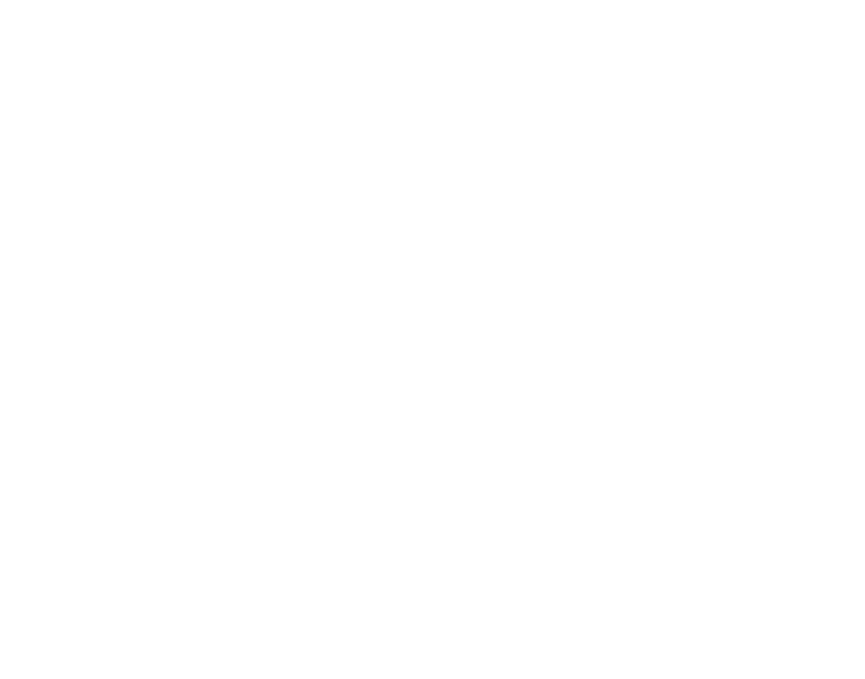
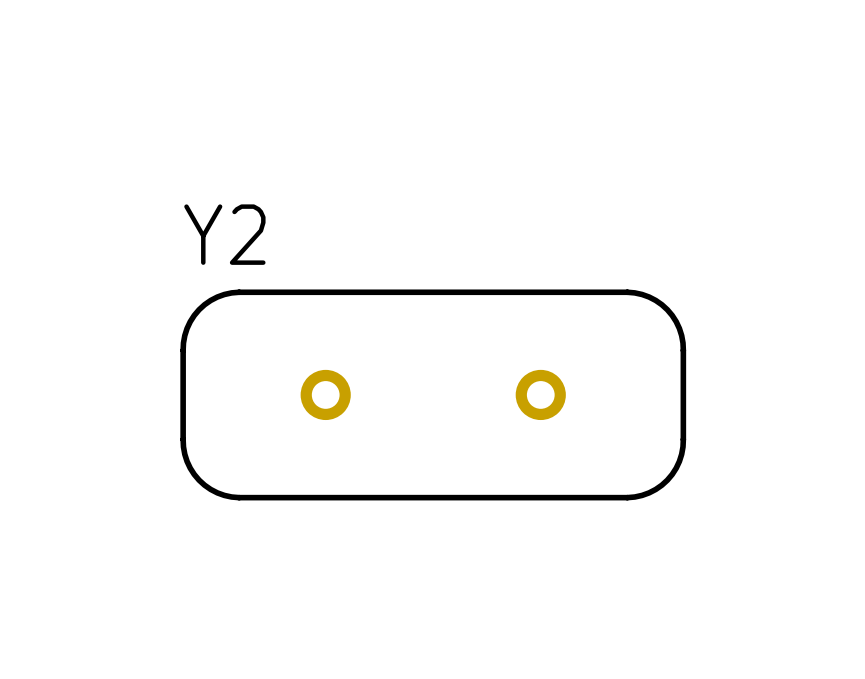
Y2: none -> (433, 394)

